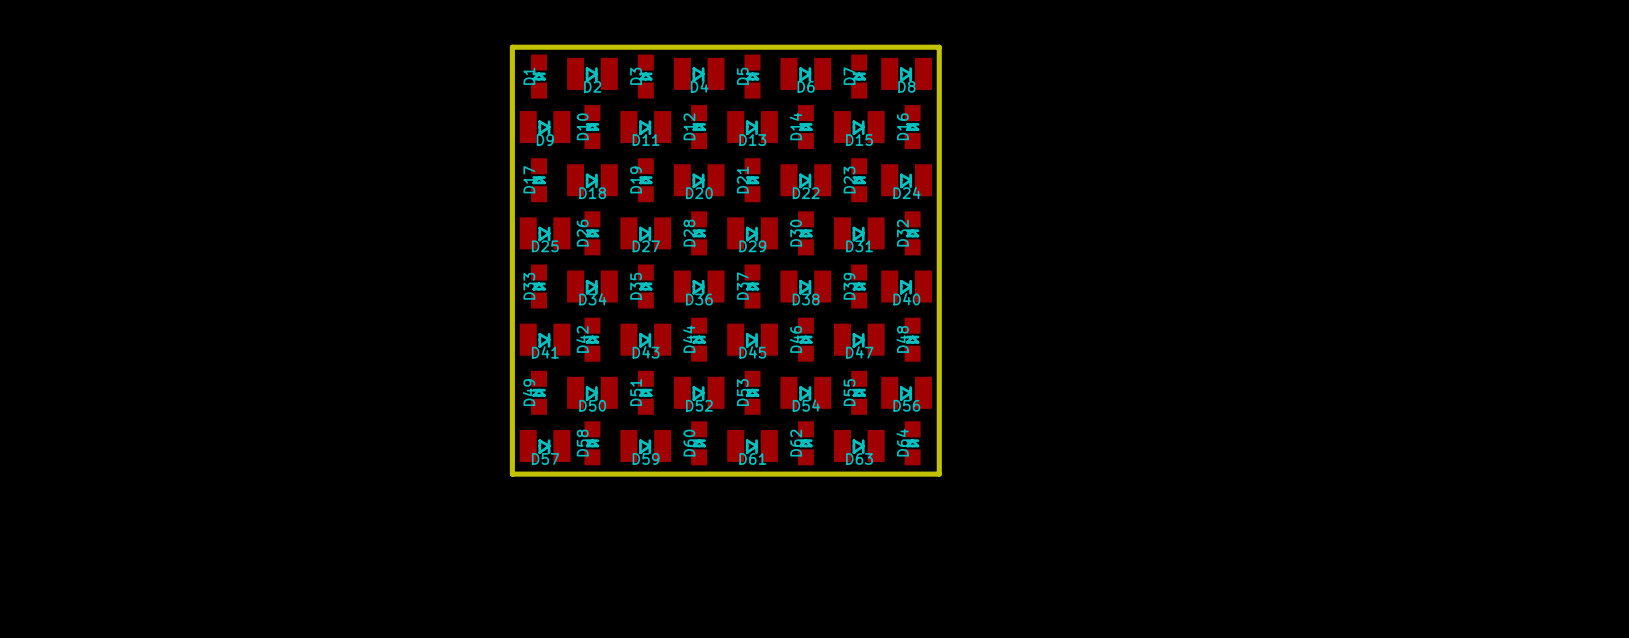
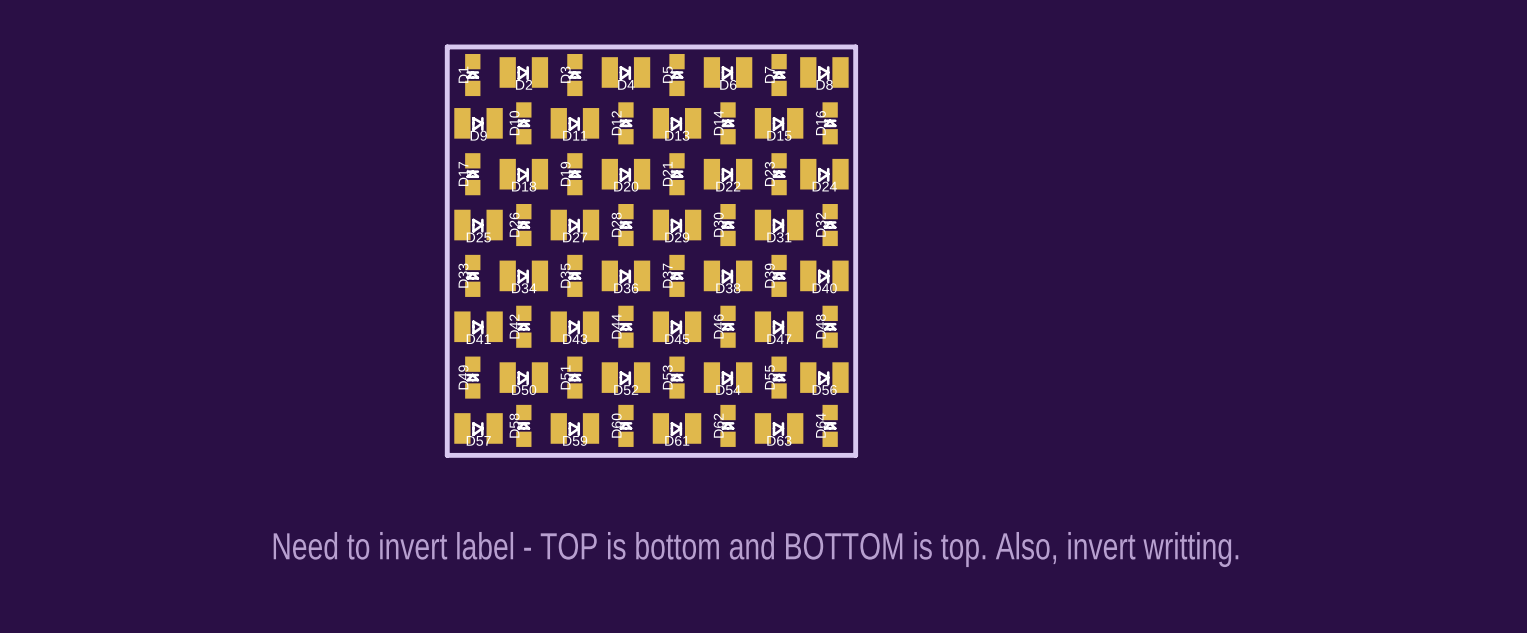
text: none -> Need to invert label - TOP is bottom and BOTTOM is top. Also, invert writting. (756, 549)

